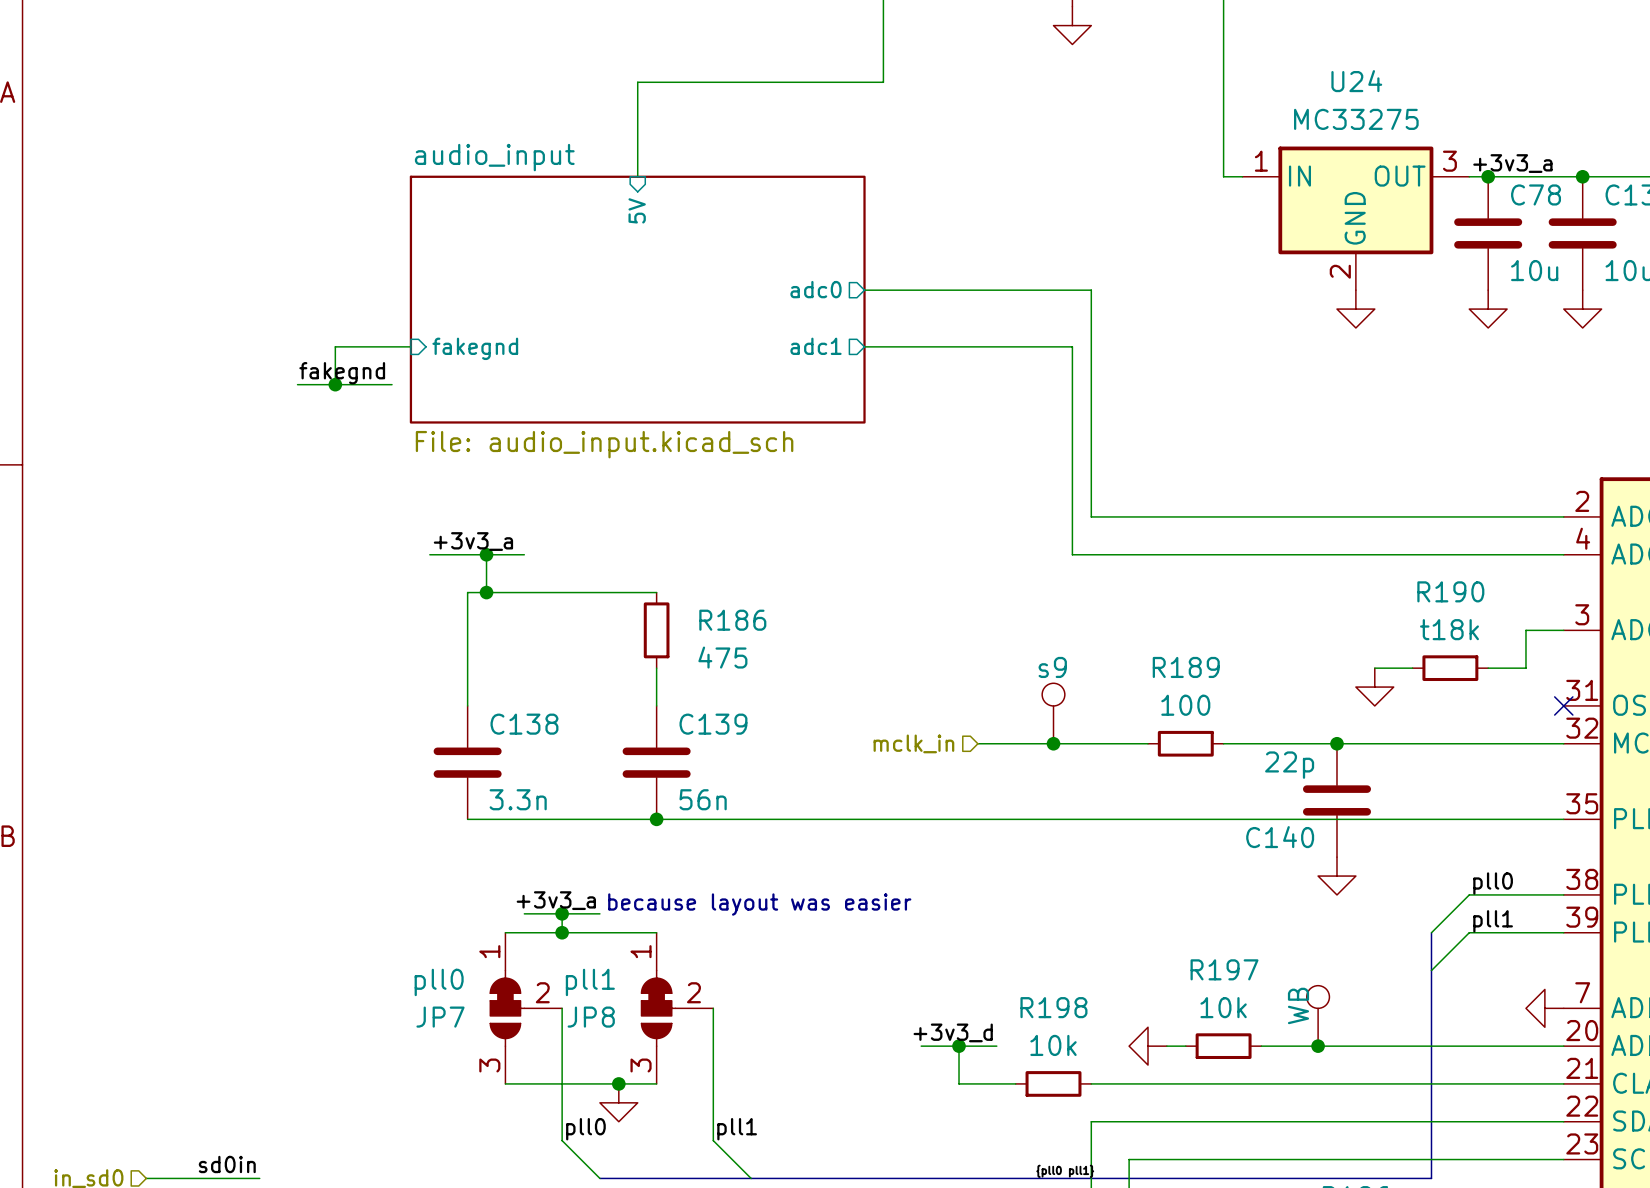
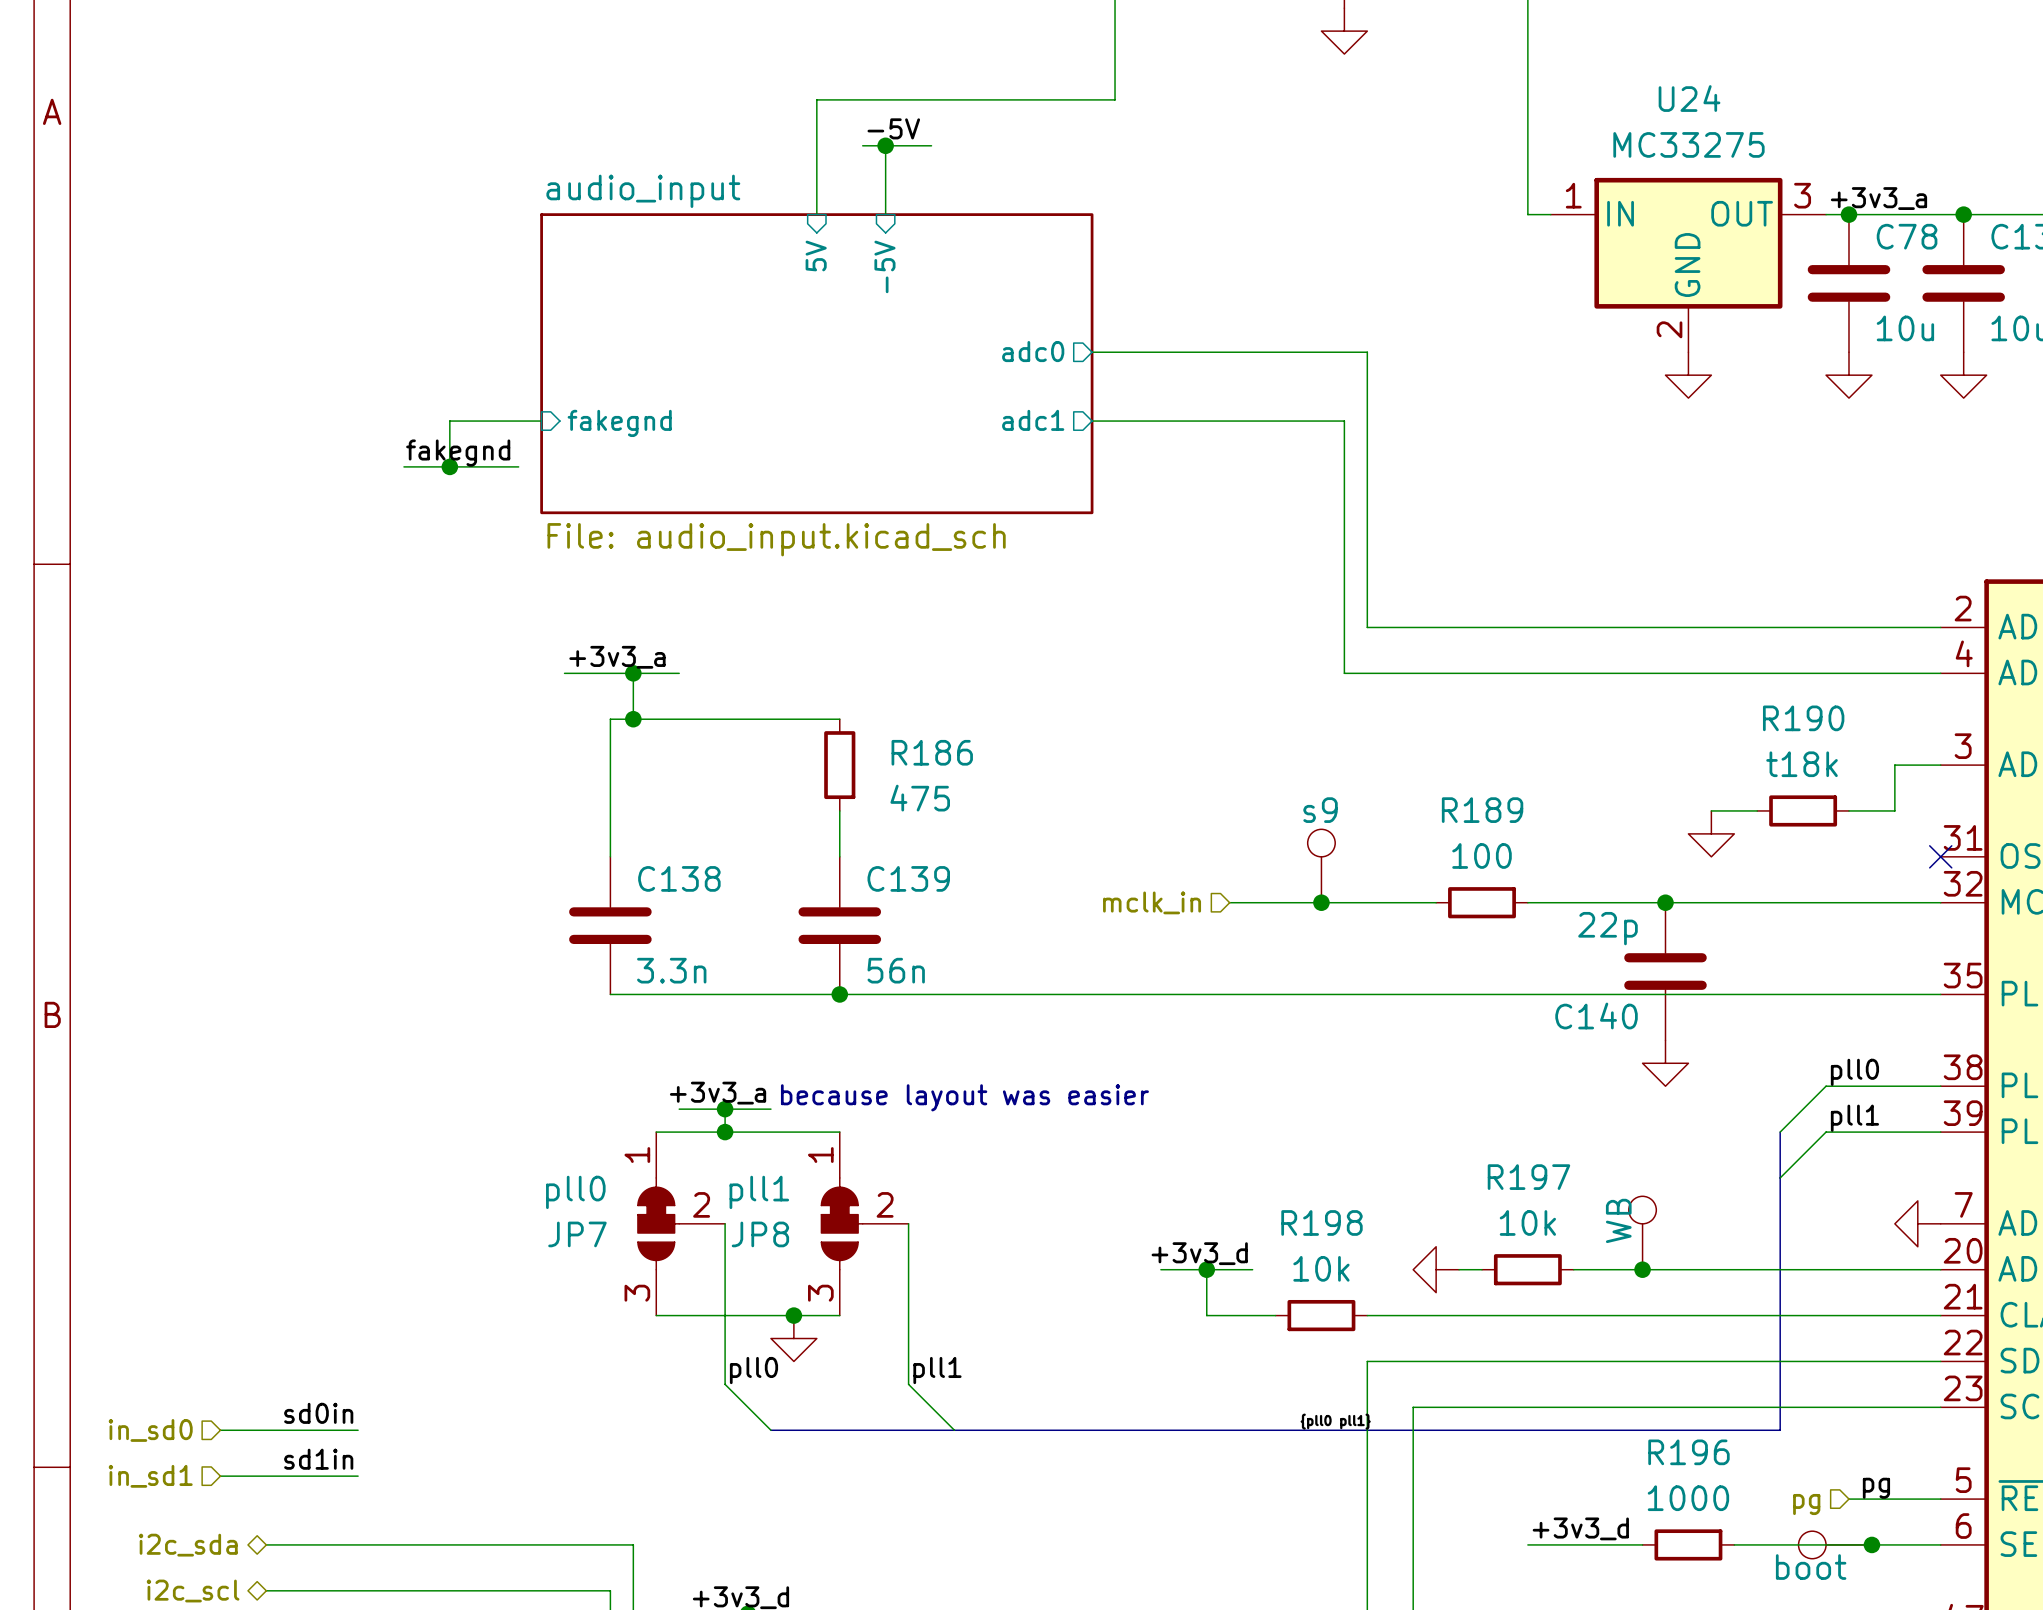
label: none -> -5V (893, 128)
wire: none -> (862, 145) (931, 145)
wire: none -> (885, 145) (885, 214)
junction: none -> (885, 145)
sheet pin: none -> -5V (884, 266)

